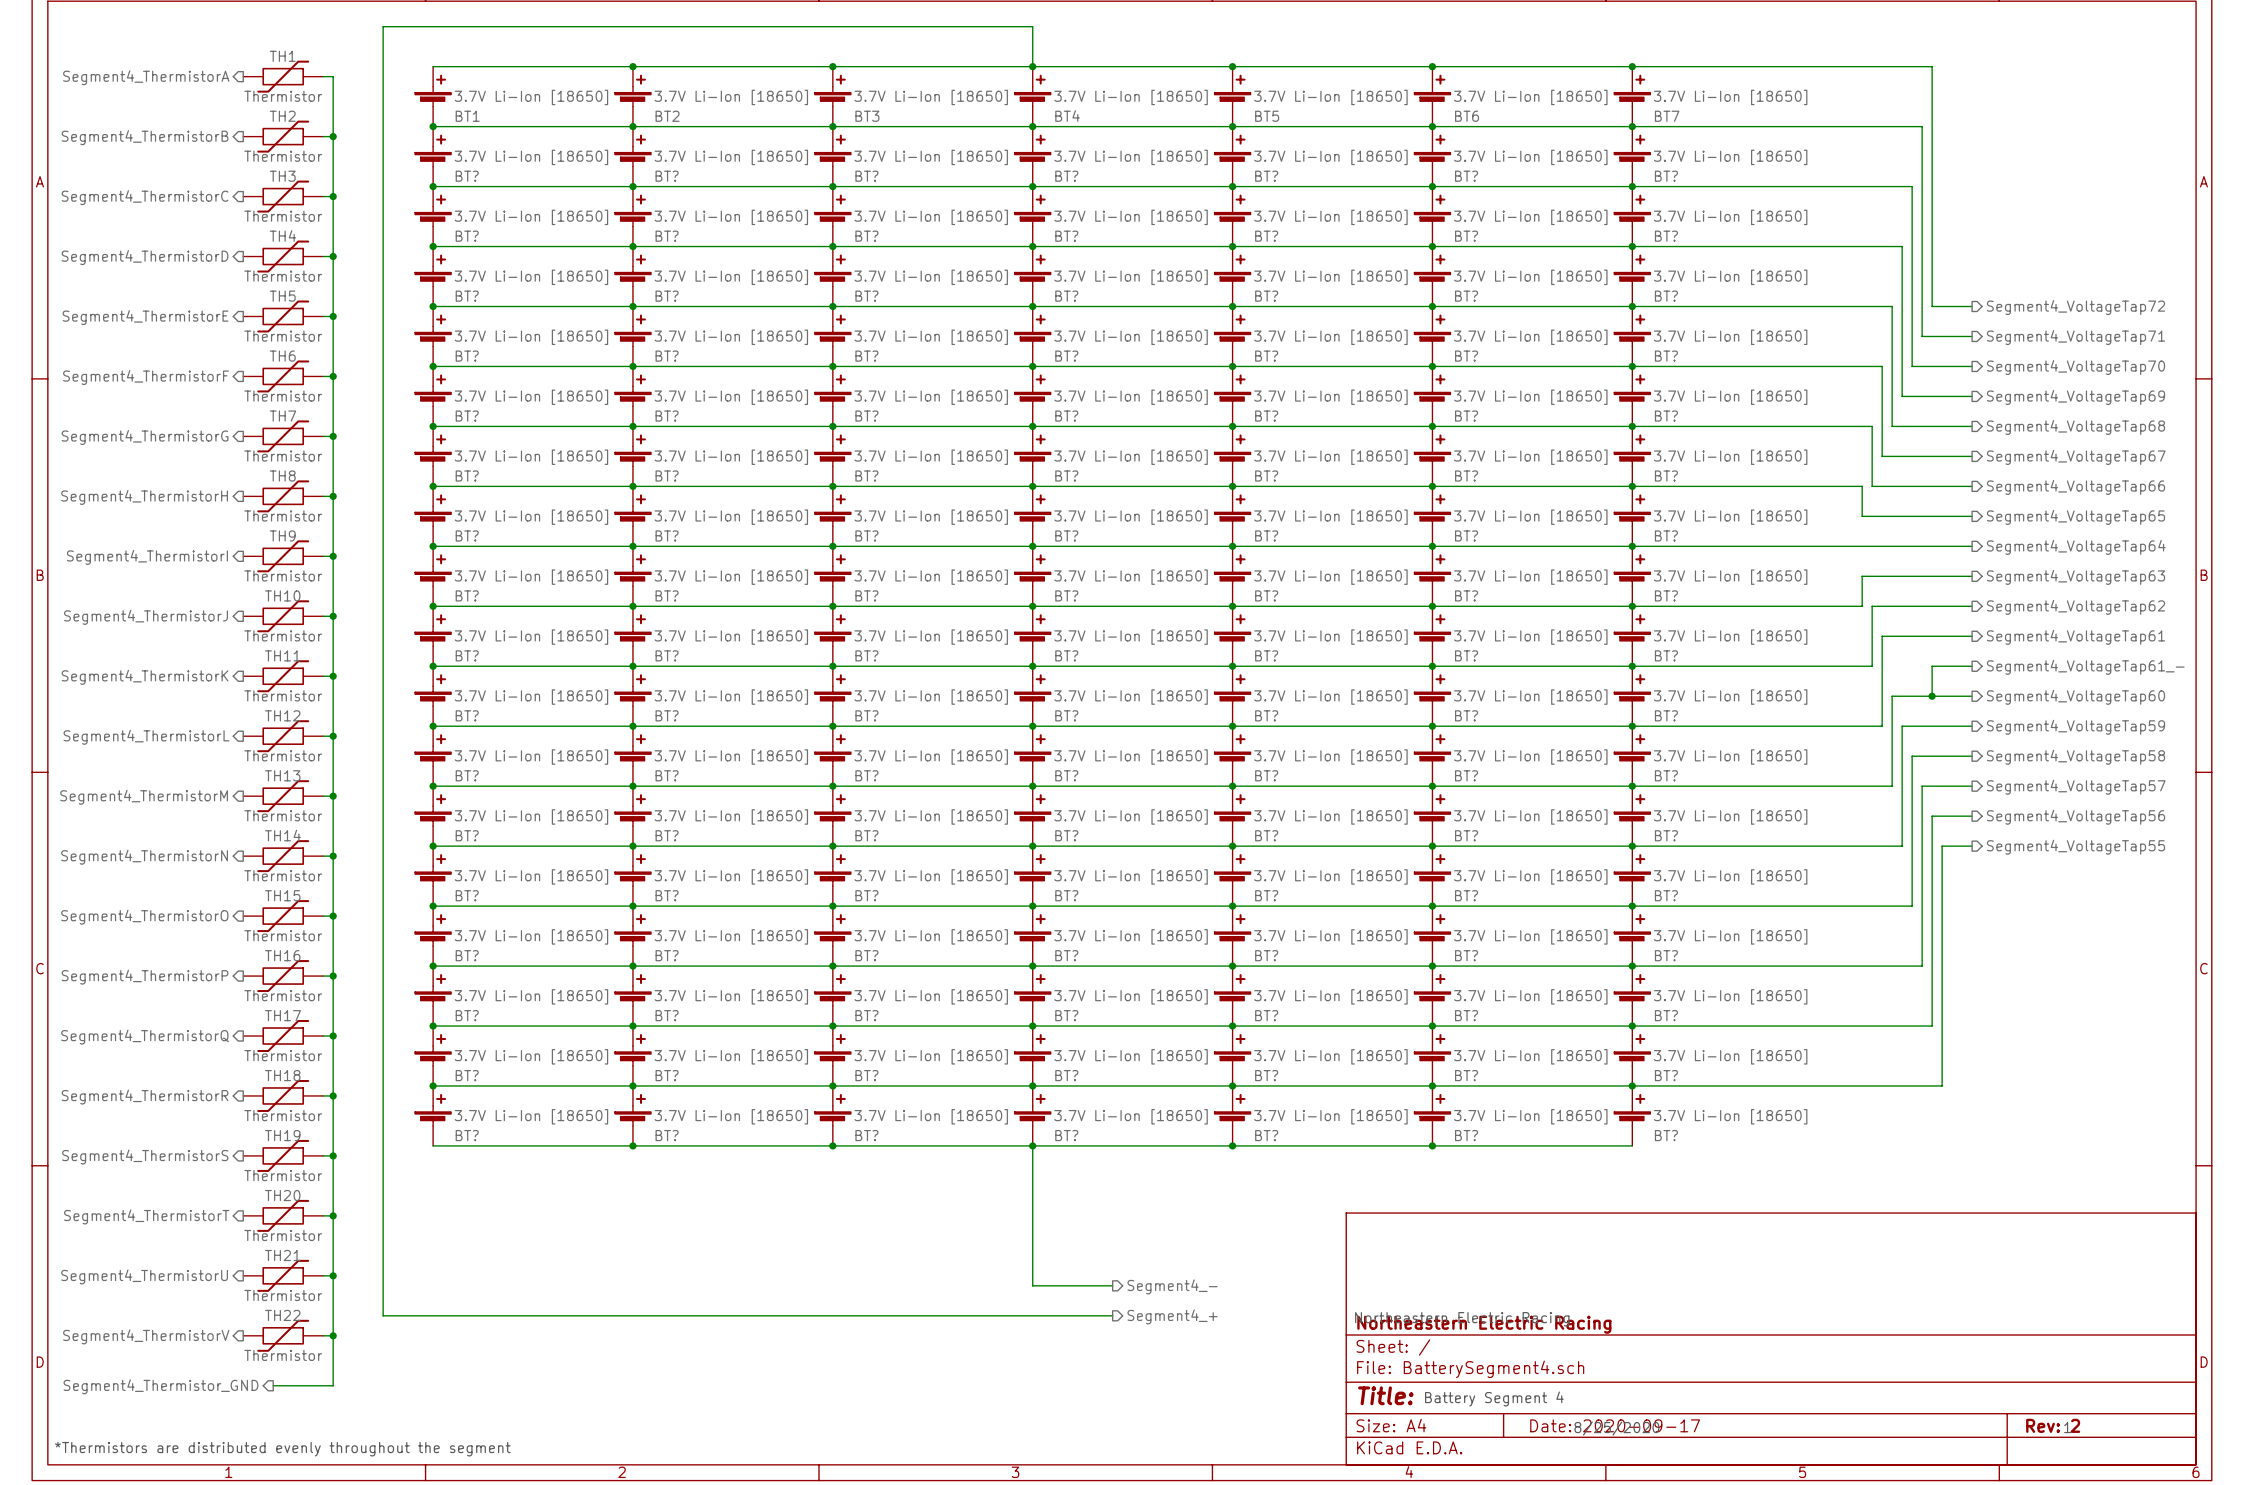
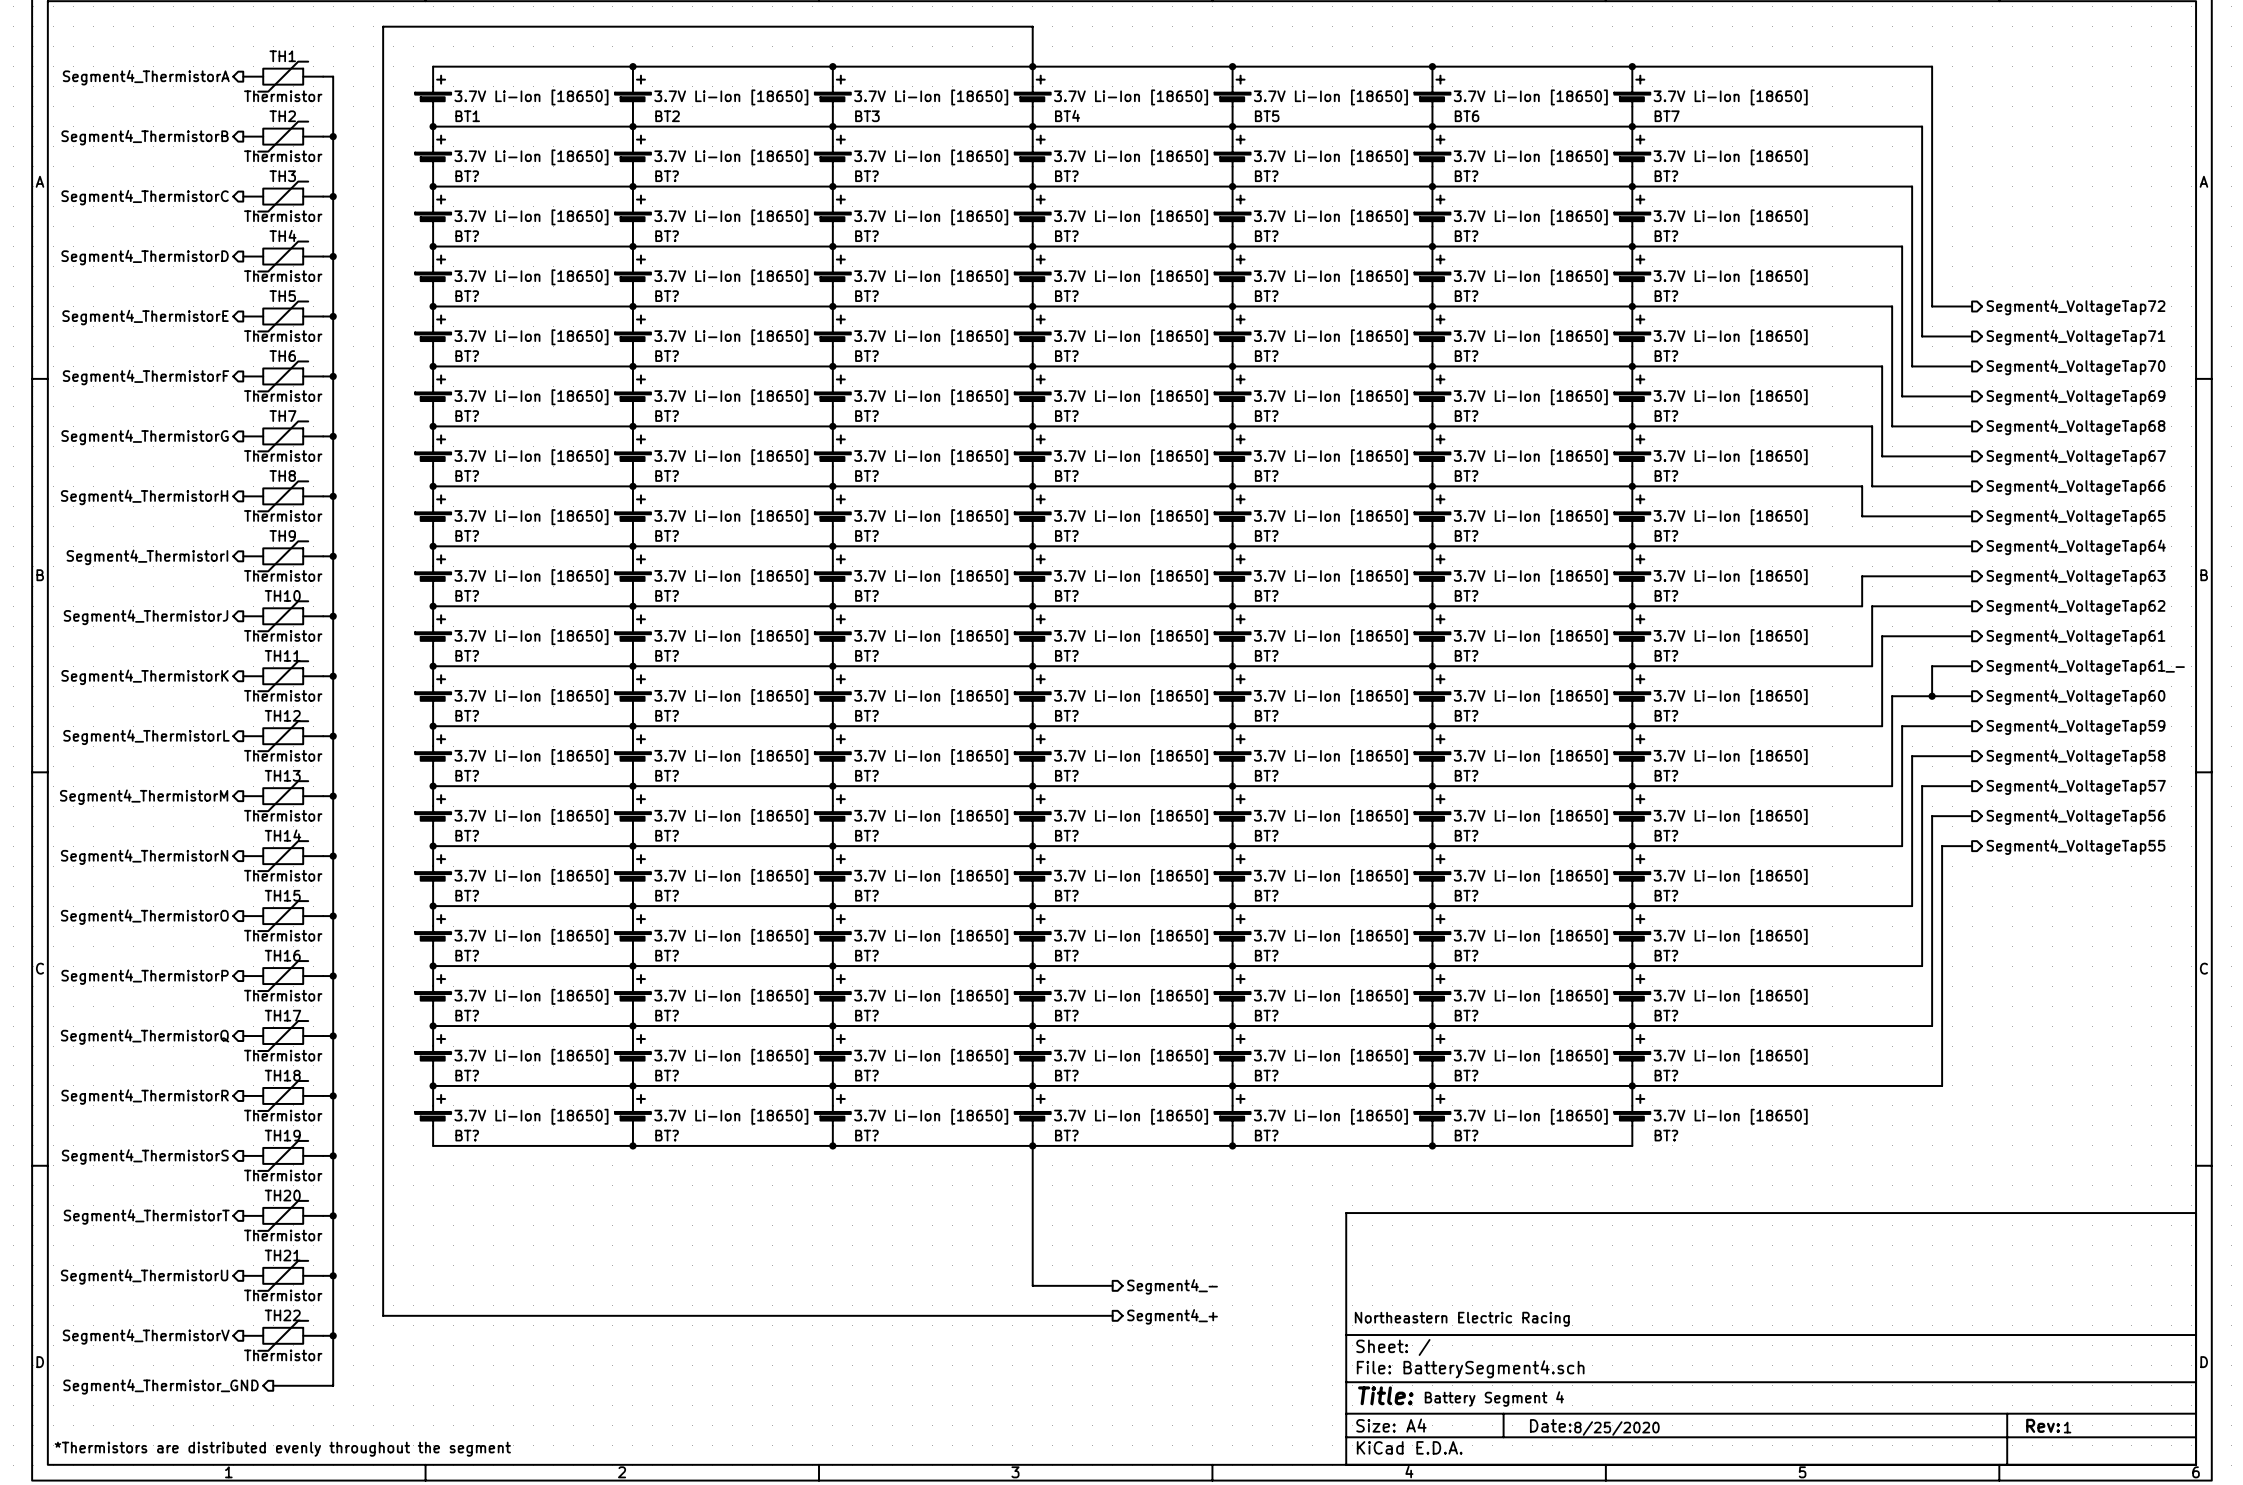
title block: Northeastern Electric Racing (1484, 1324) -> none
title block: Date: 2020-09-17 (1615, 1425) -> Date: (1550, 1425)
title block: Rev: 2 (2053, 1425) -> Rev: (2043, 1425)

